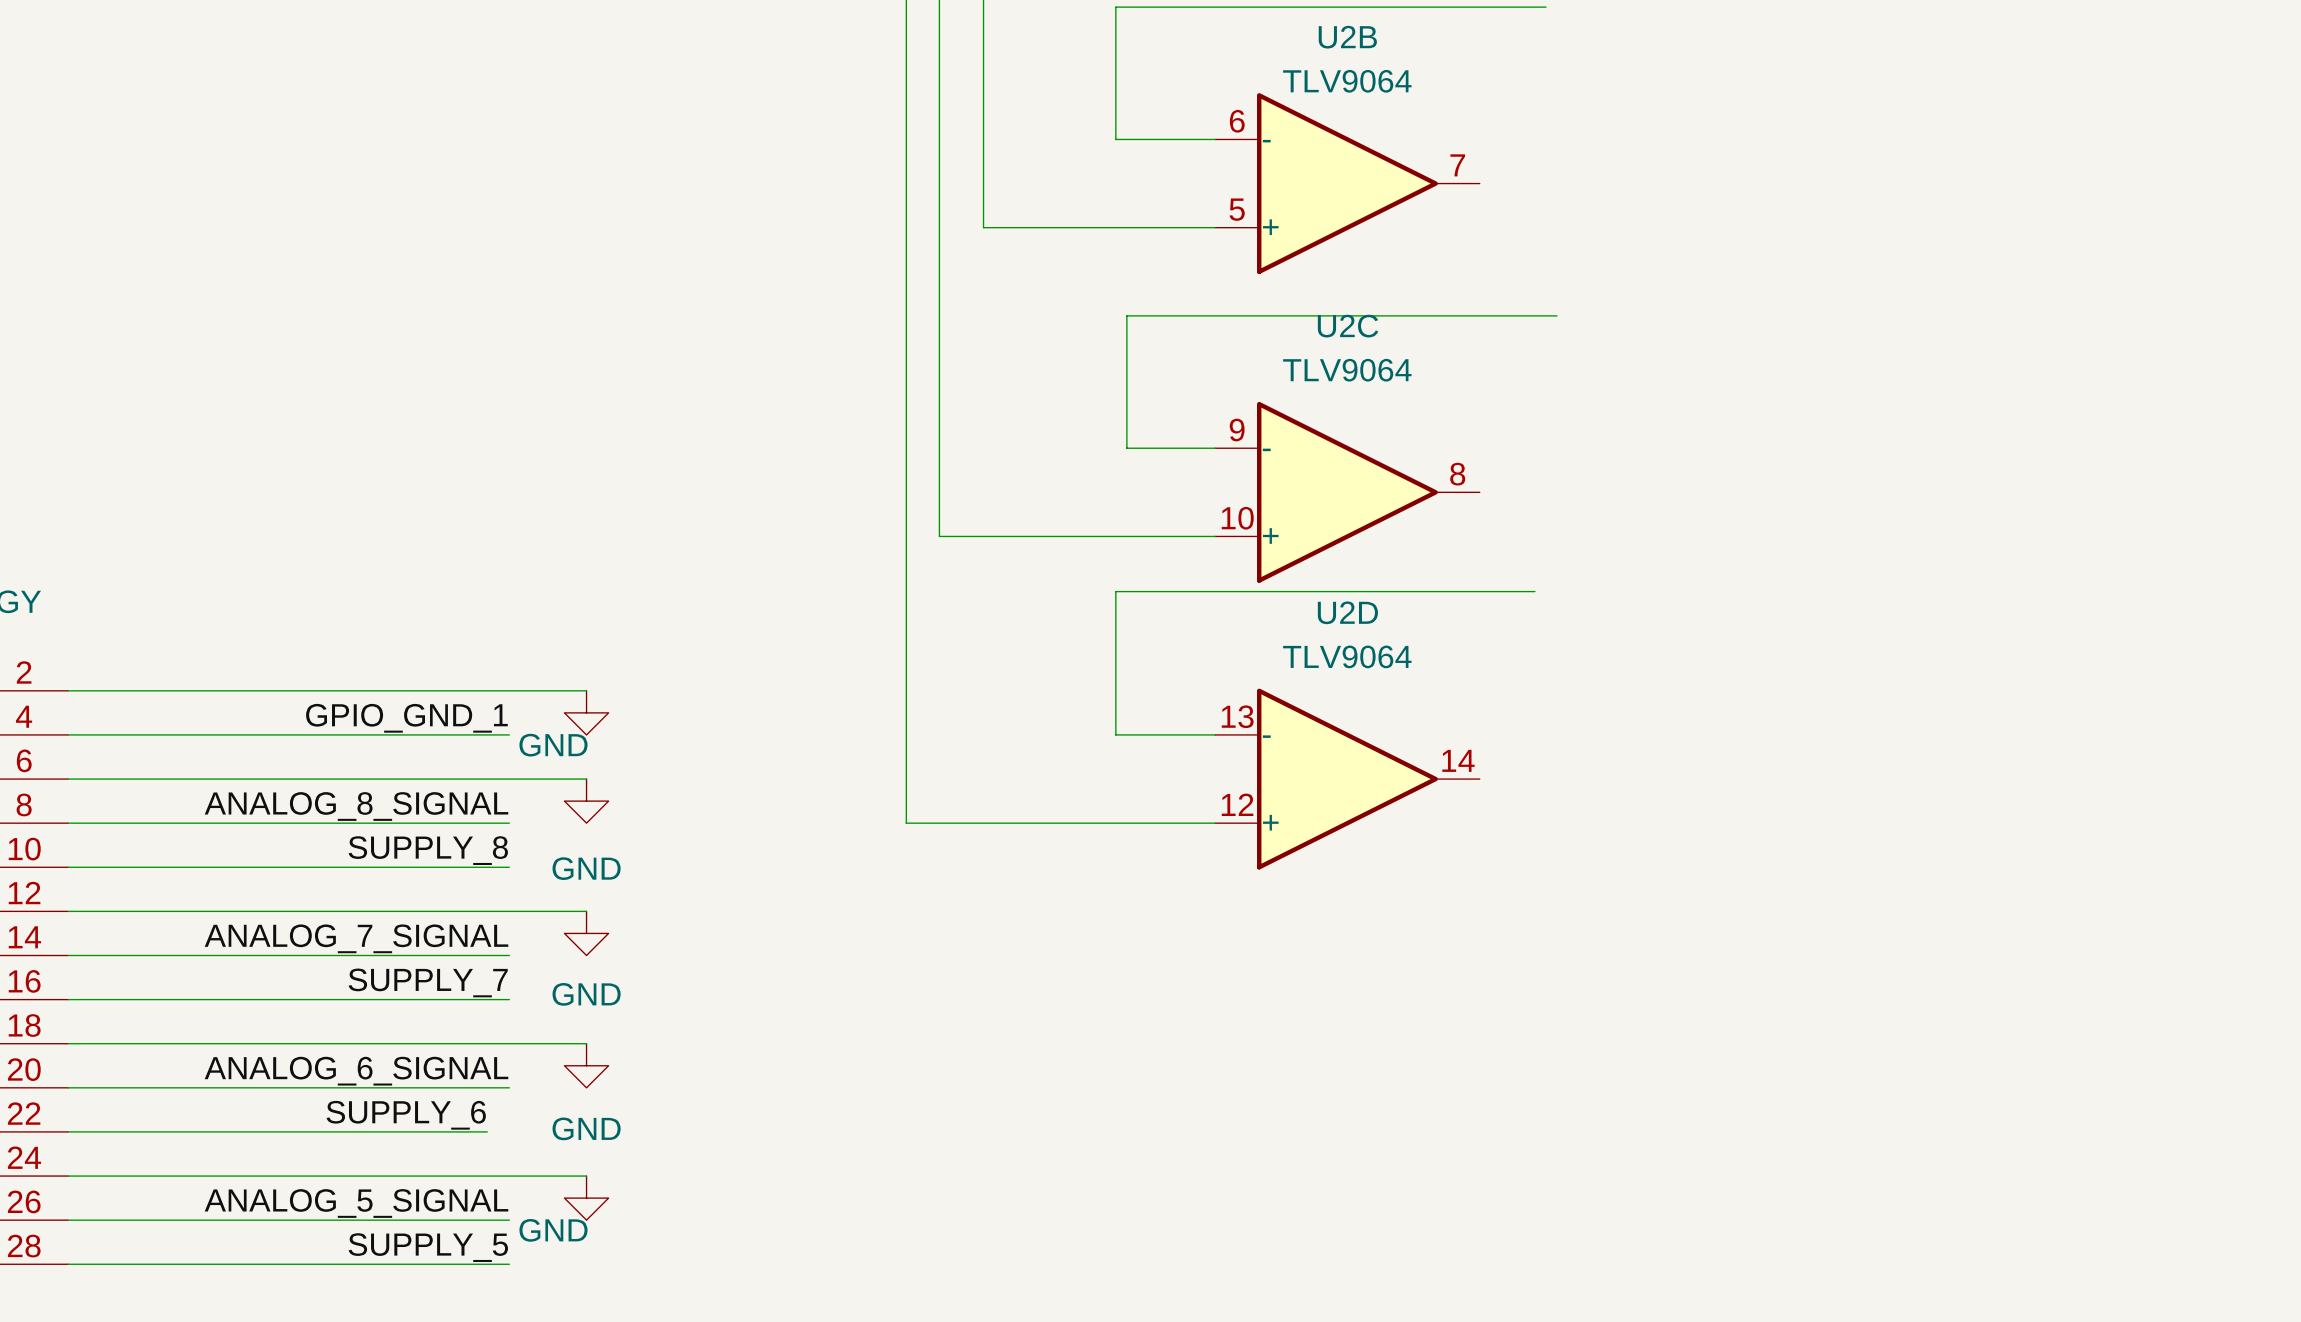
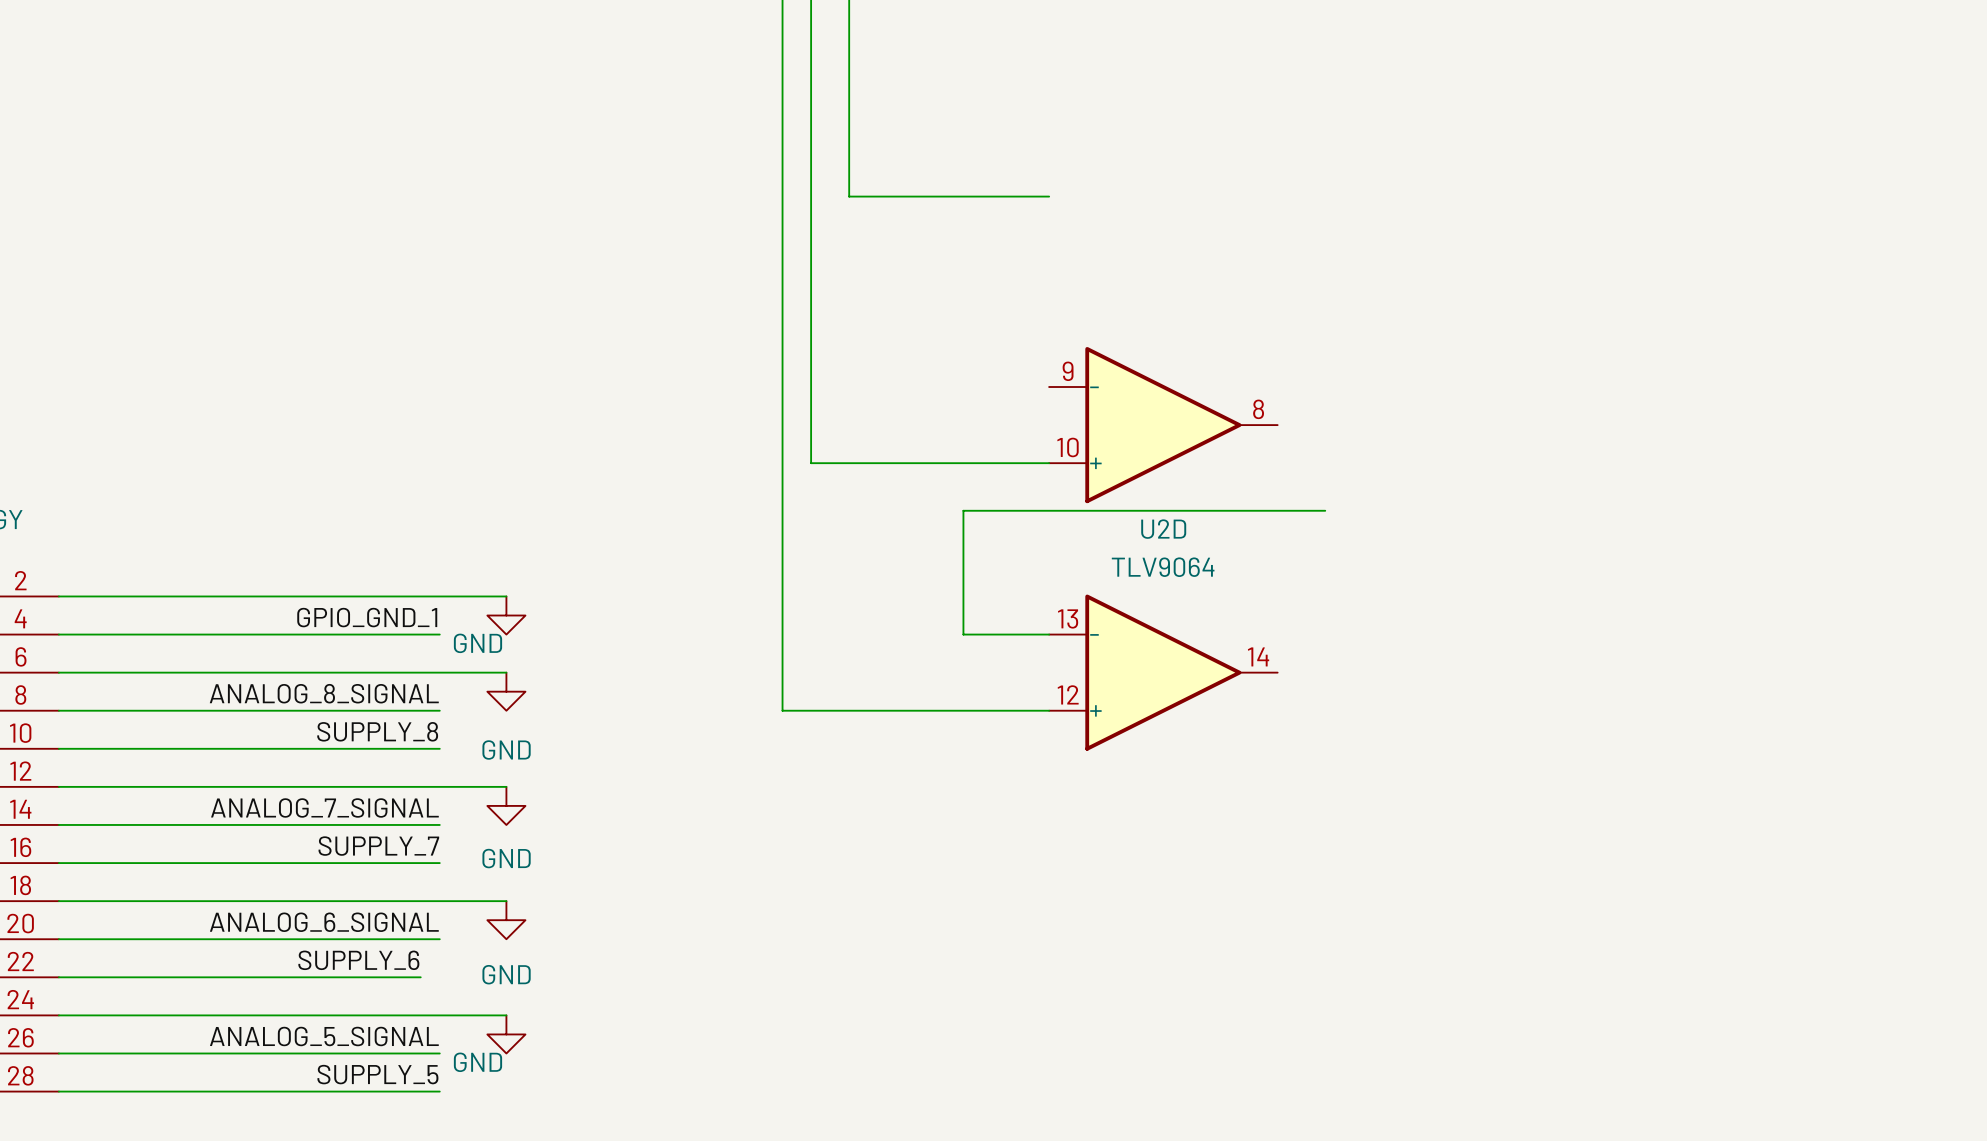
wire: (1545, 7) (1115, 7) (1115, 139) (1215, 139) -> none
U2B: TLV9064 (1347, 183) -> none
wire: (1556, 315) (1126, 315) (1126, 448) (1215, 448) -> none
U2C name: U2C (1348, 326) -> none
U2C value: TLV9064 (1347, 370) -> none

